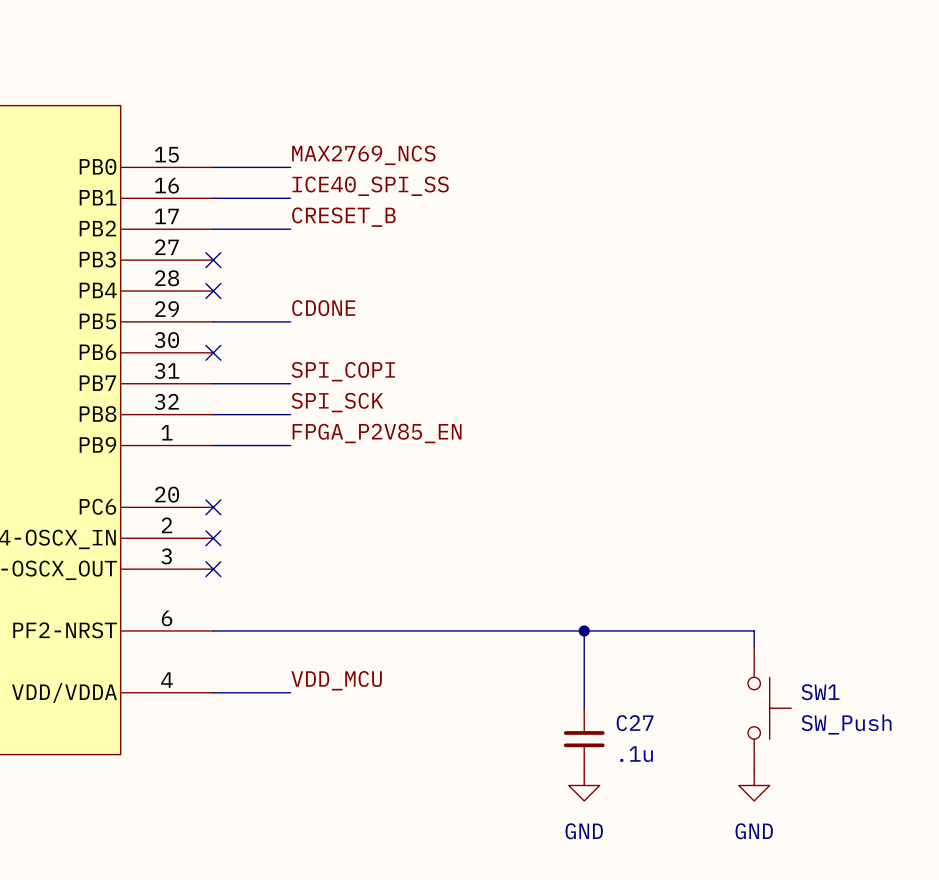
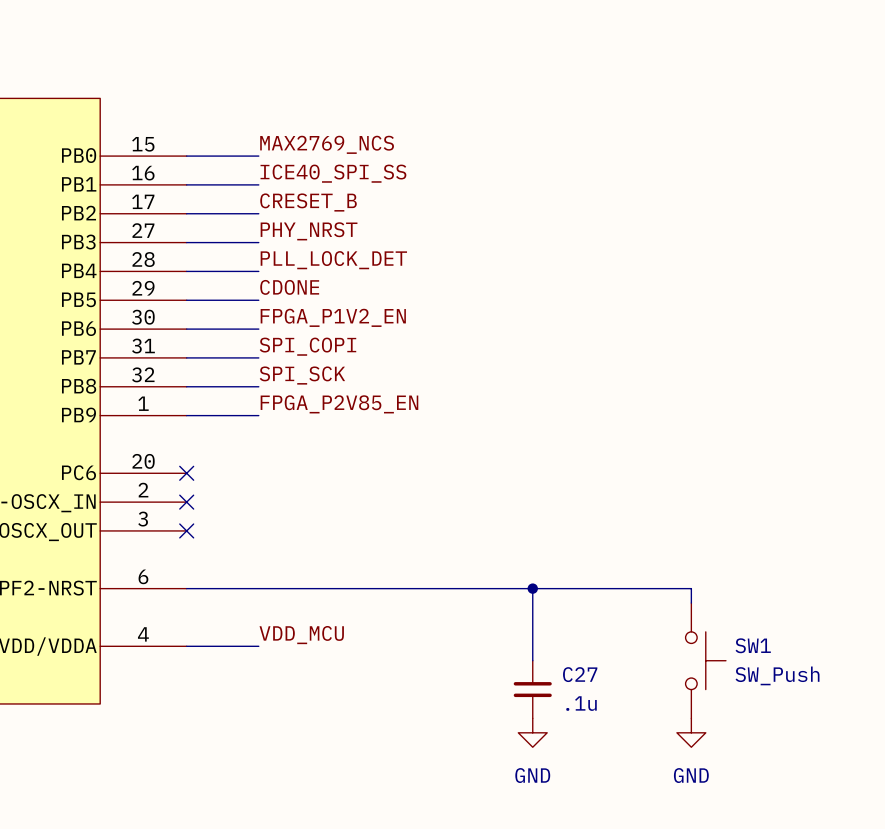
label: none -> PHY_NRST (309, 231)
wire: none -> (186, 242) (258, 242)
no-connect mark: (213, 260) -> none
label: none -> PLL_LOCK_DET (333, 260)
wire: none -> (186, 271) (258, 271)
no-connect mark: (213, 291) -> none
label: none -> FPGA_P1V2_EN (333, 317)
wire: none -> (186, 329) (258, 329)
no-connect mark: (213, 352) -> none

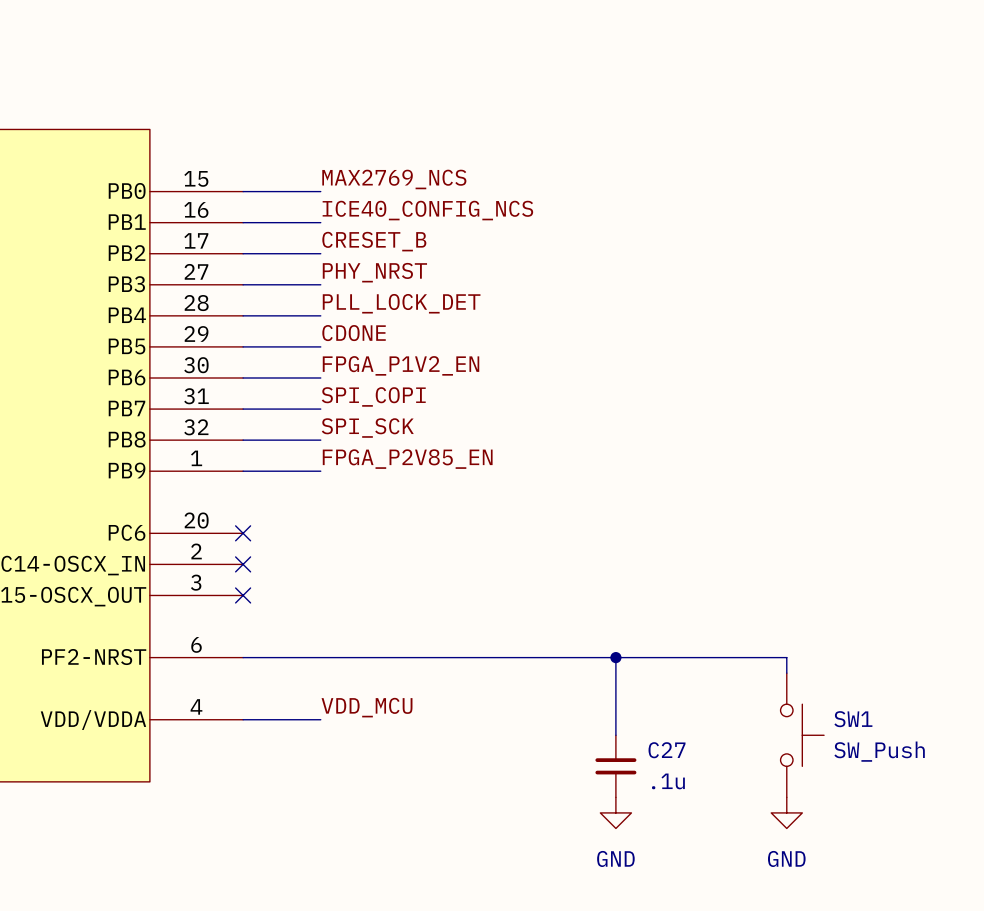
label: ICE40_SPI_SS (333, 173) -> ICE40_CONFIG_NCS (427, 210)

